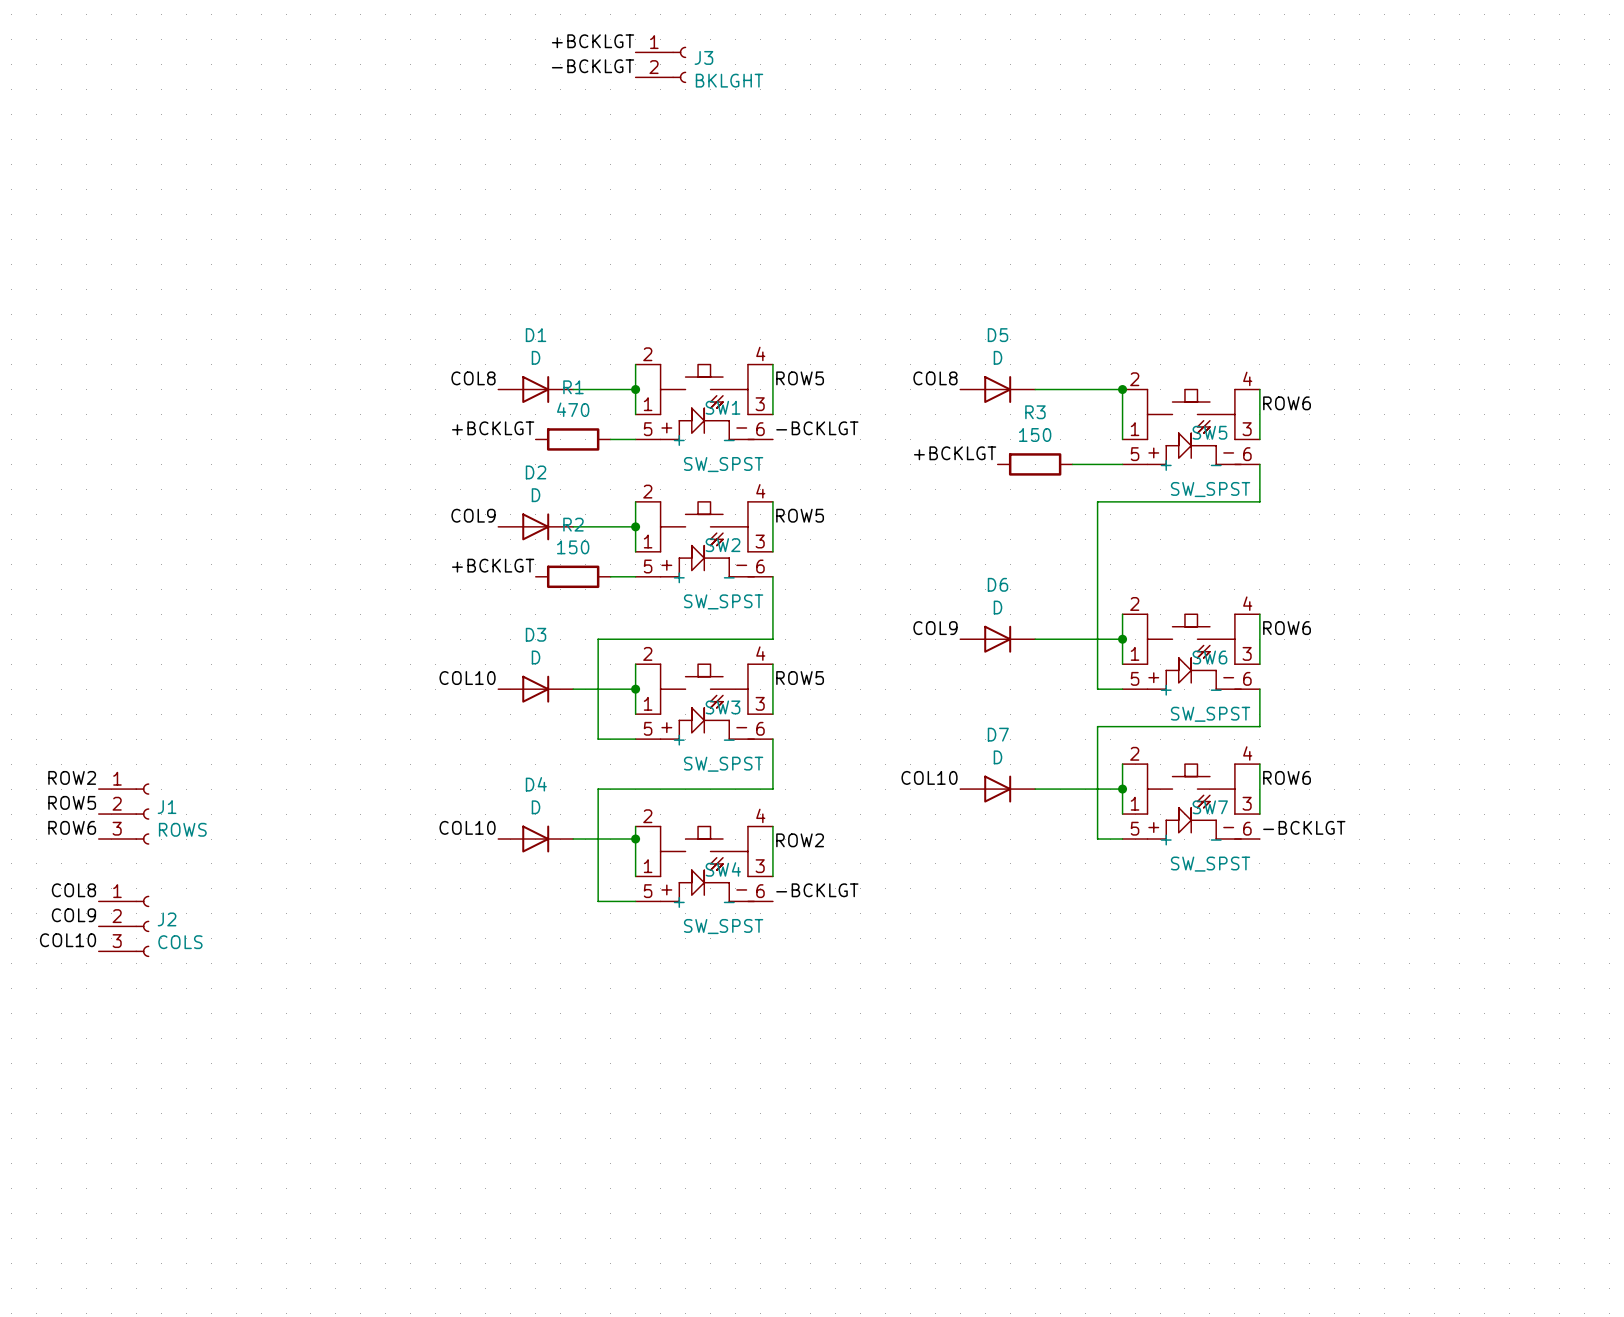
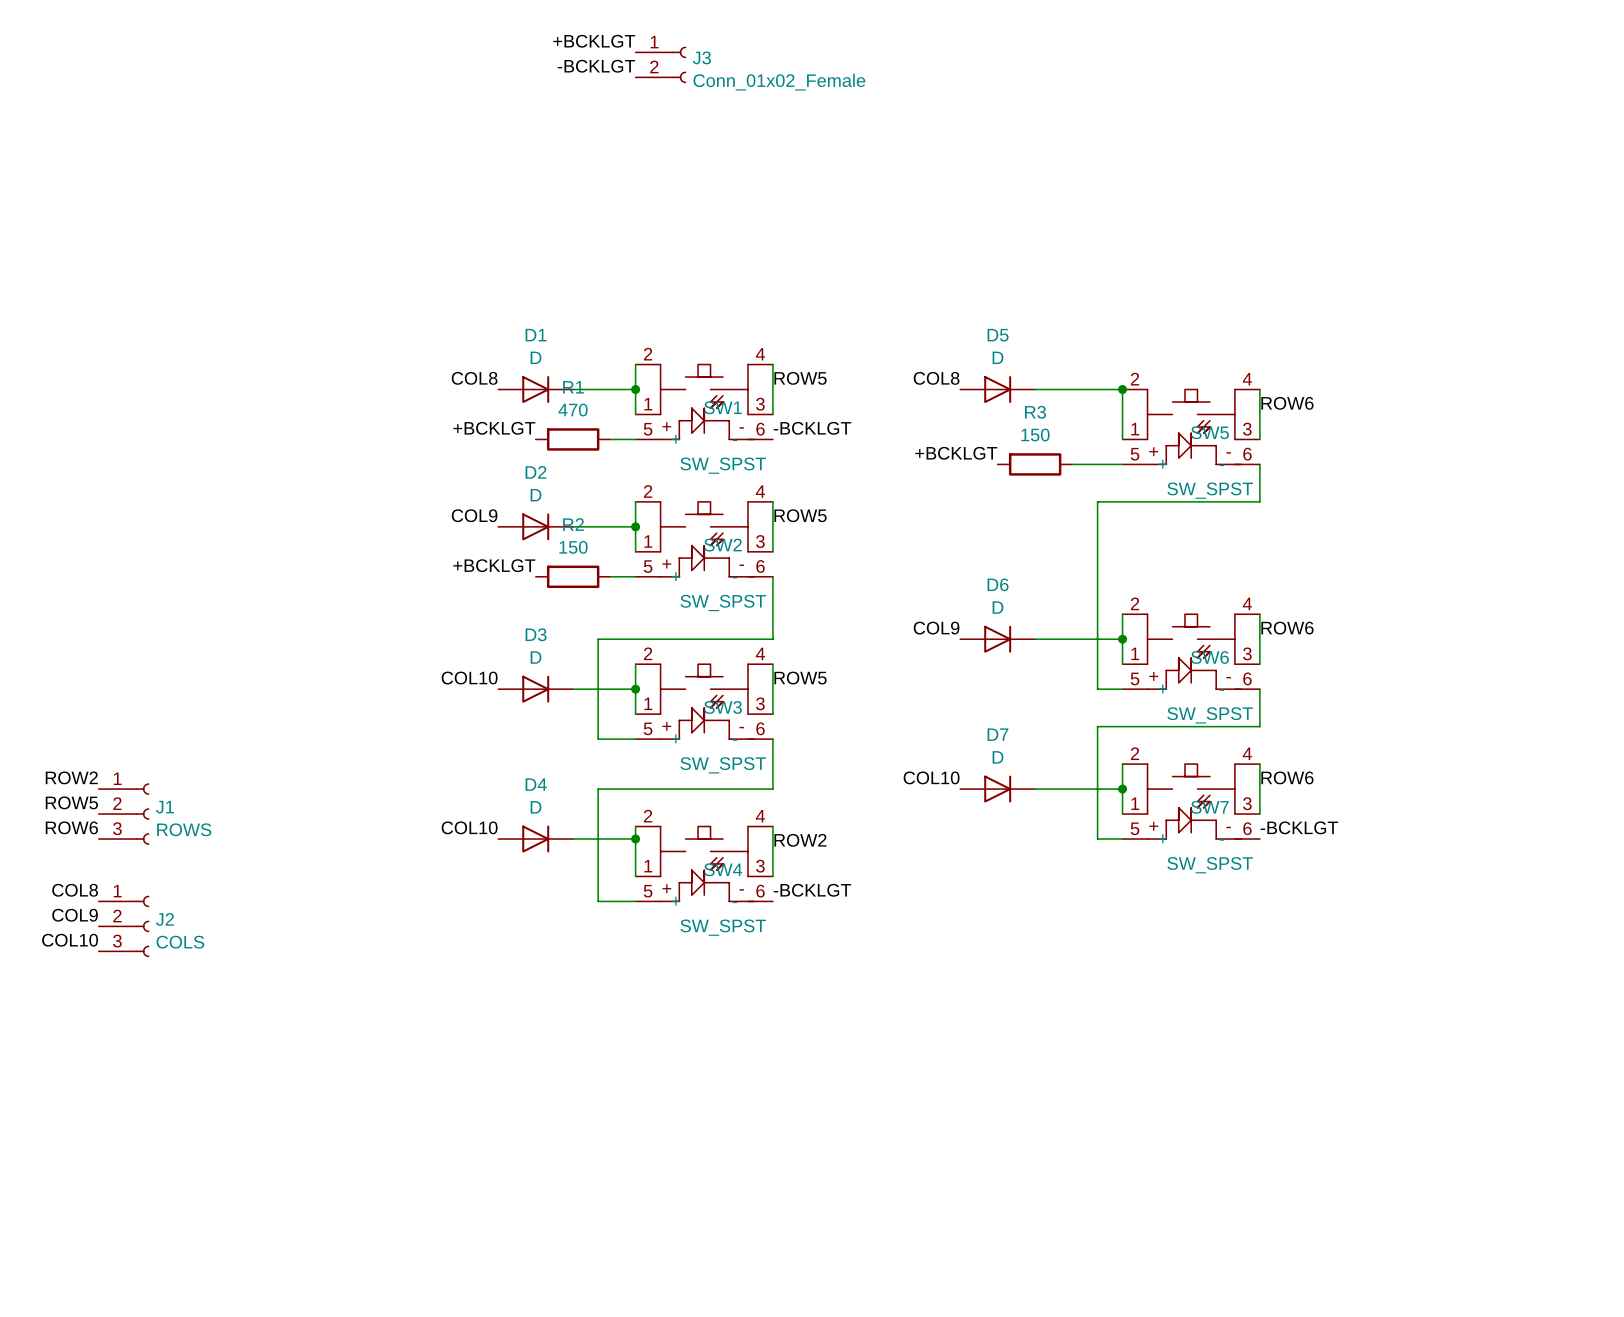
J3 value: BKLGHT (729, 80) -> Conn_01x02_Female (779, 82)

